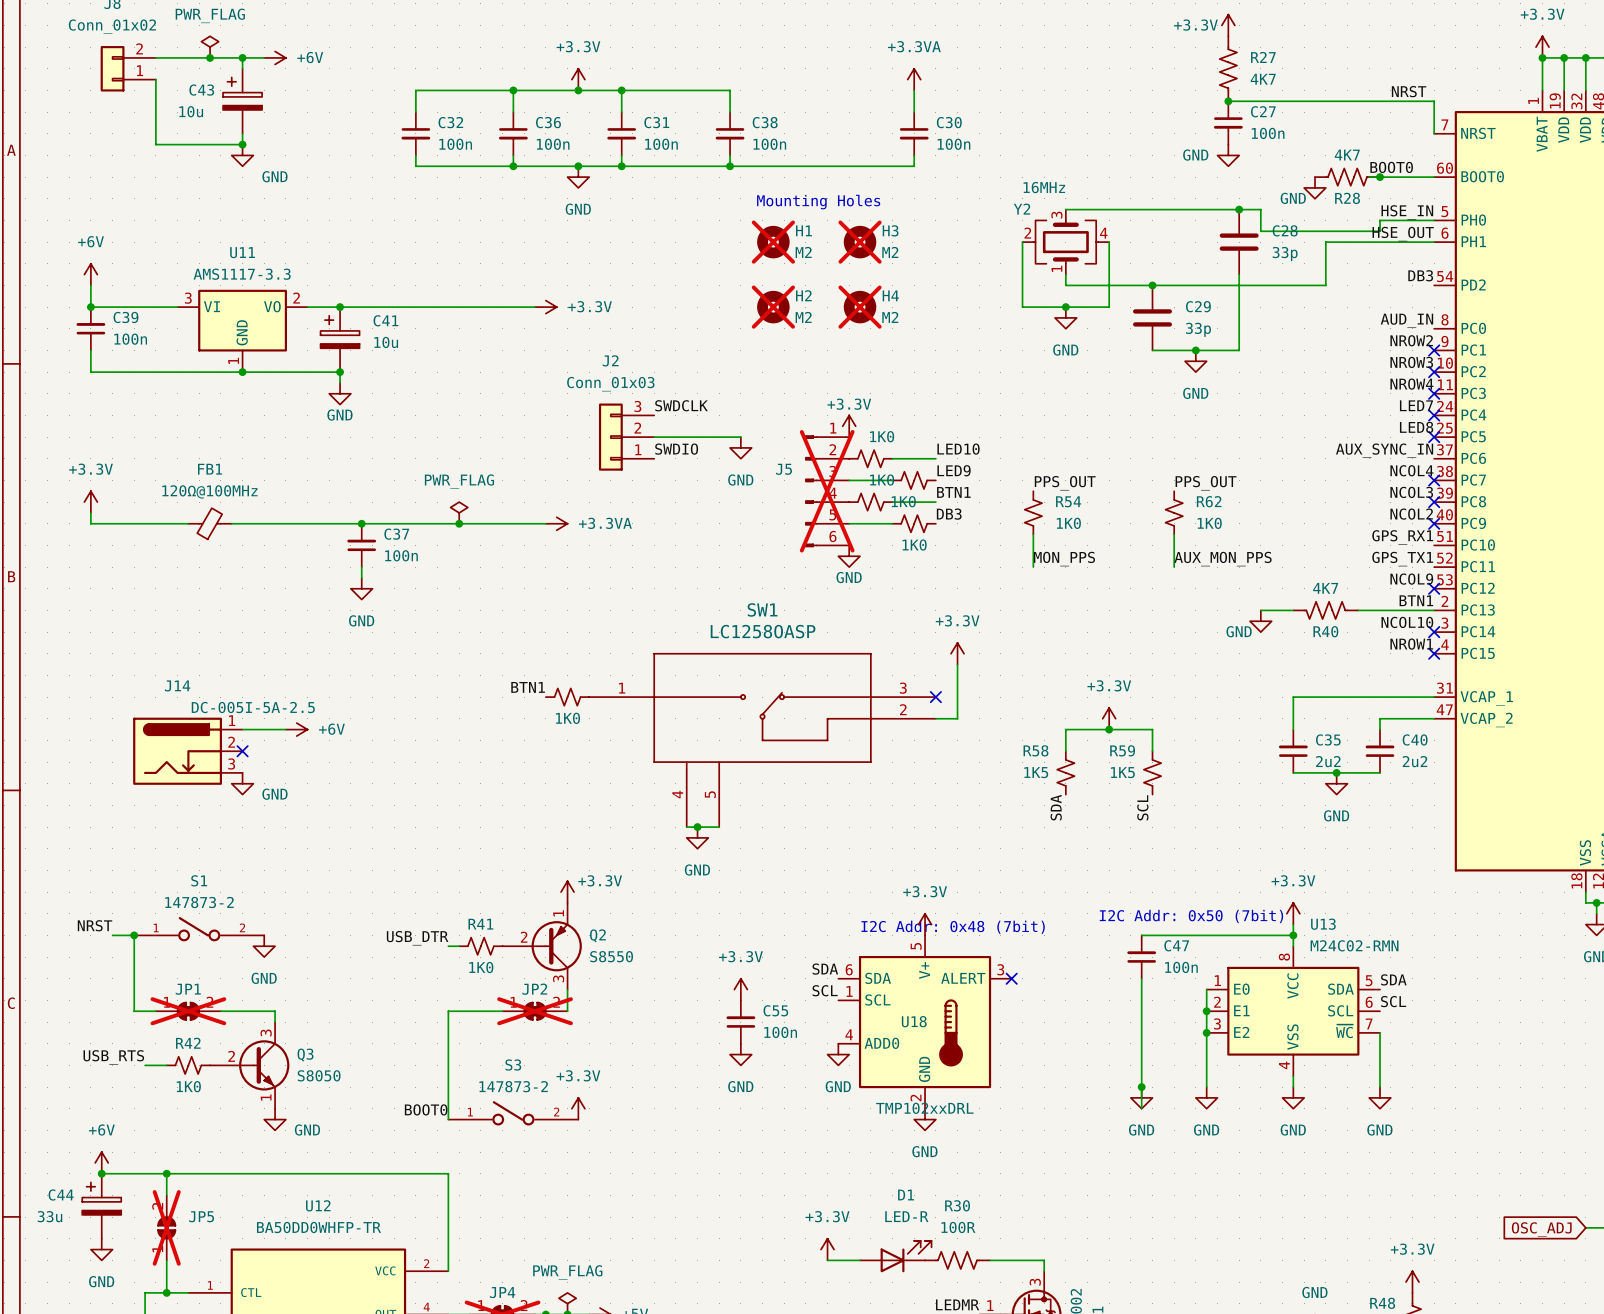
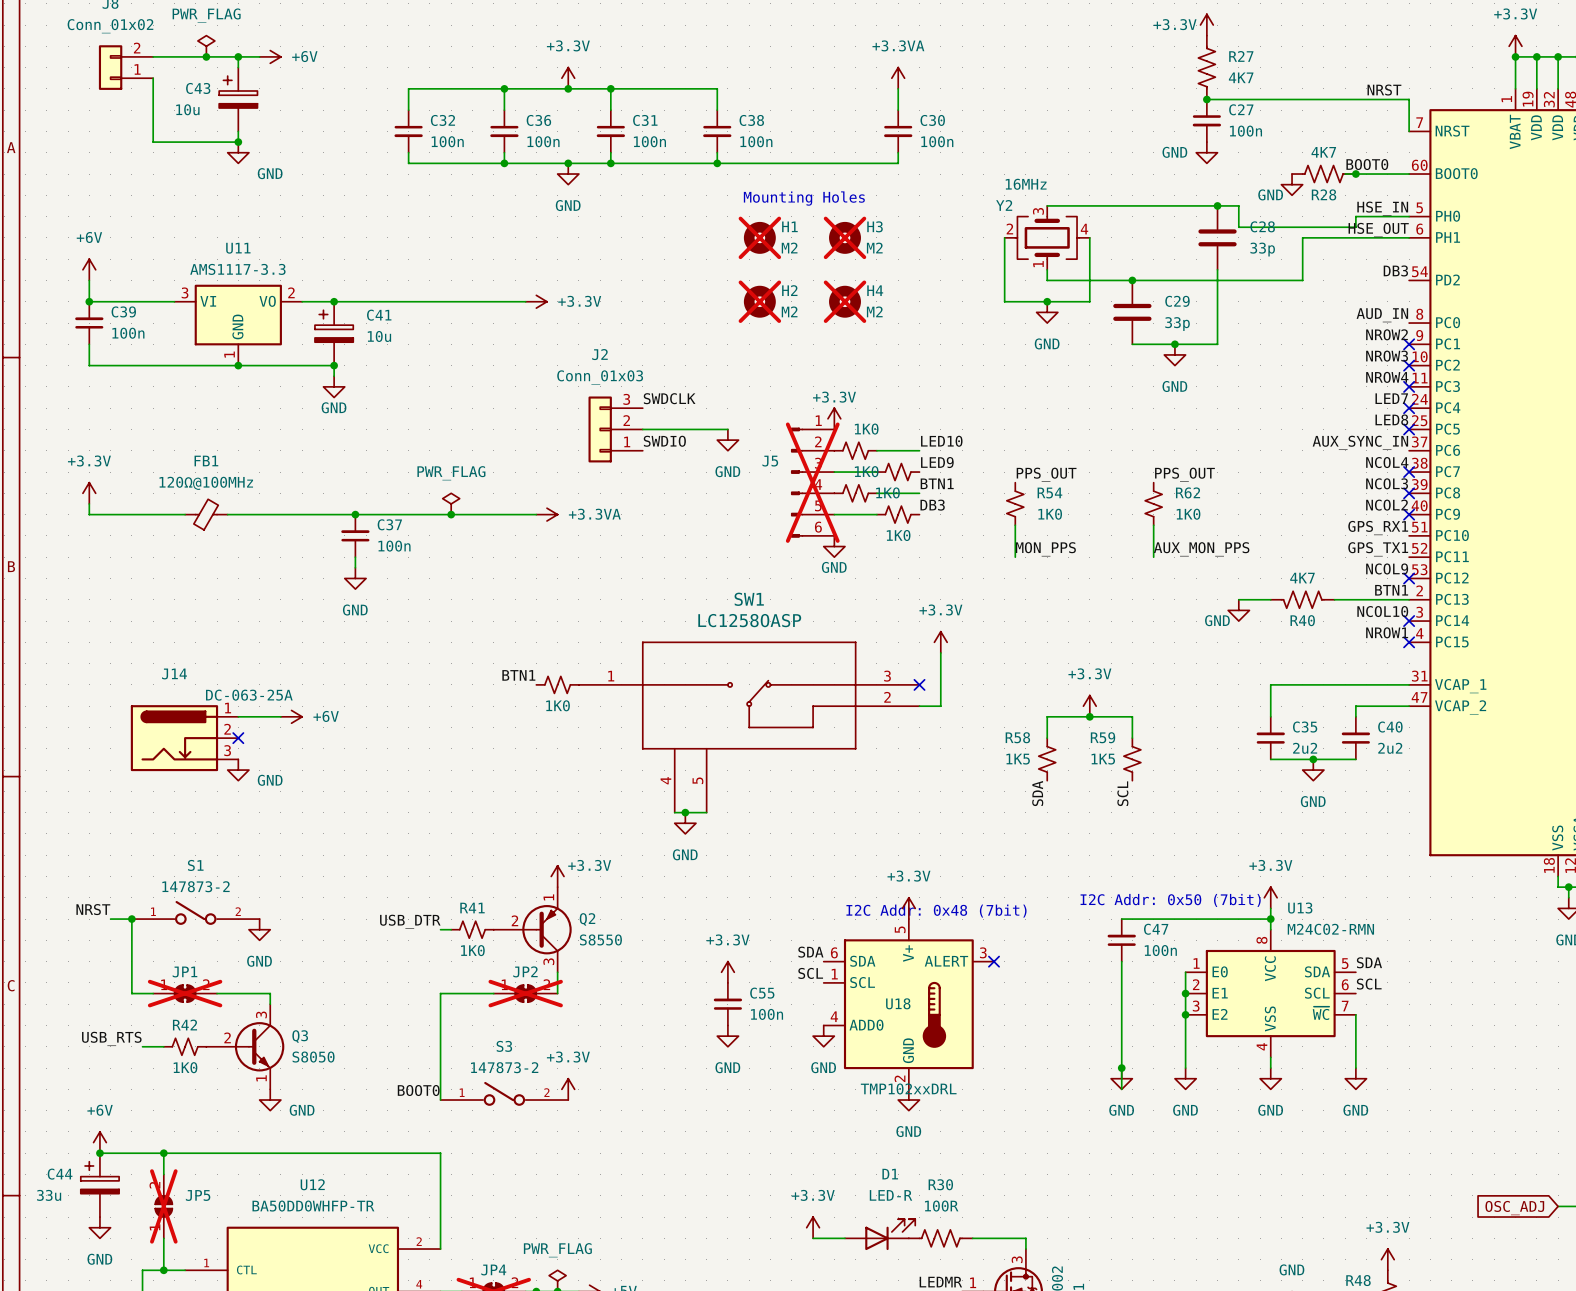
J14 value: DC-005I-5A-2.5 (253, 707) -> DC-063-25A (249, 695)

